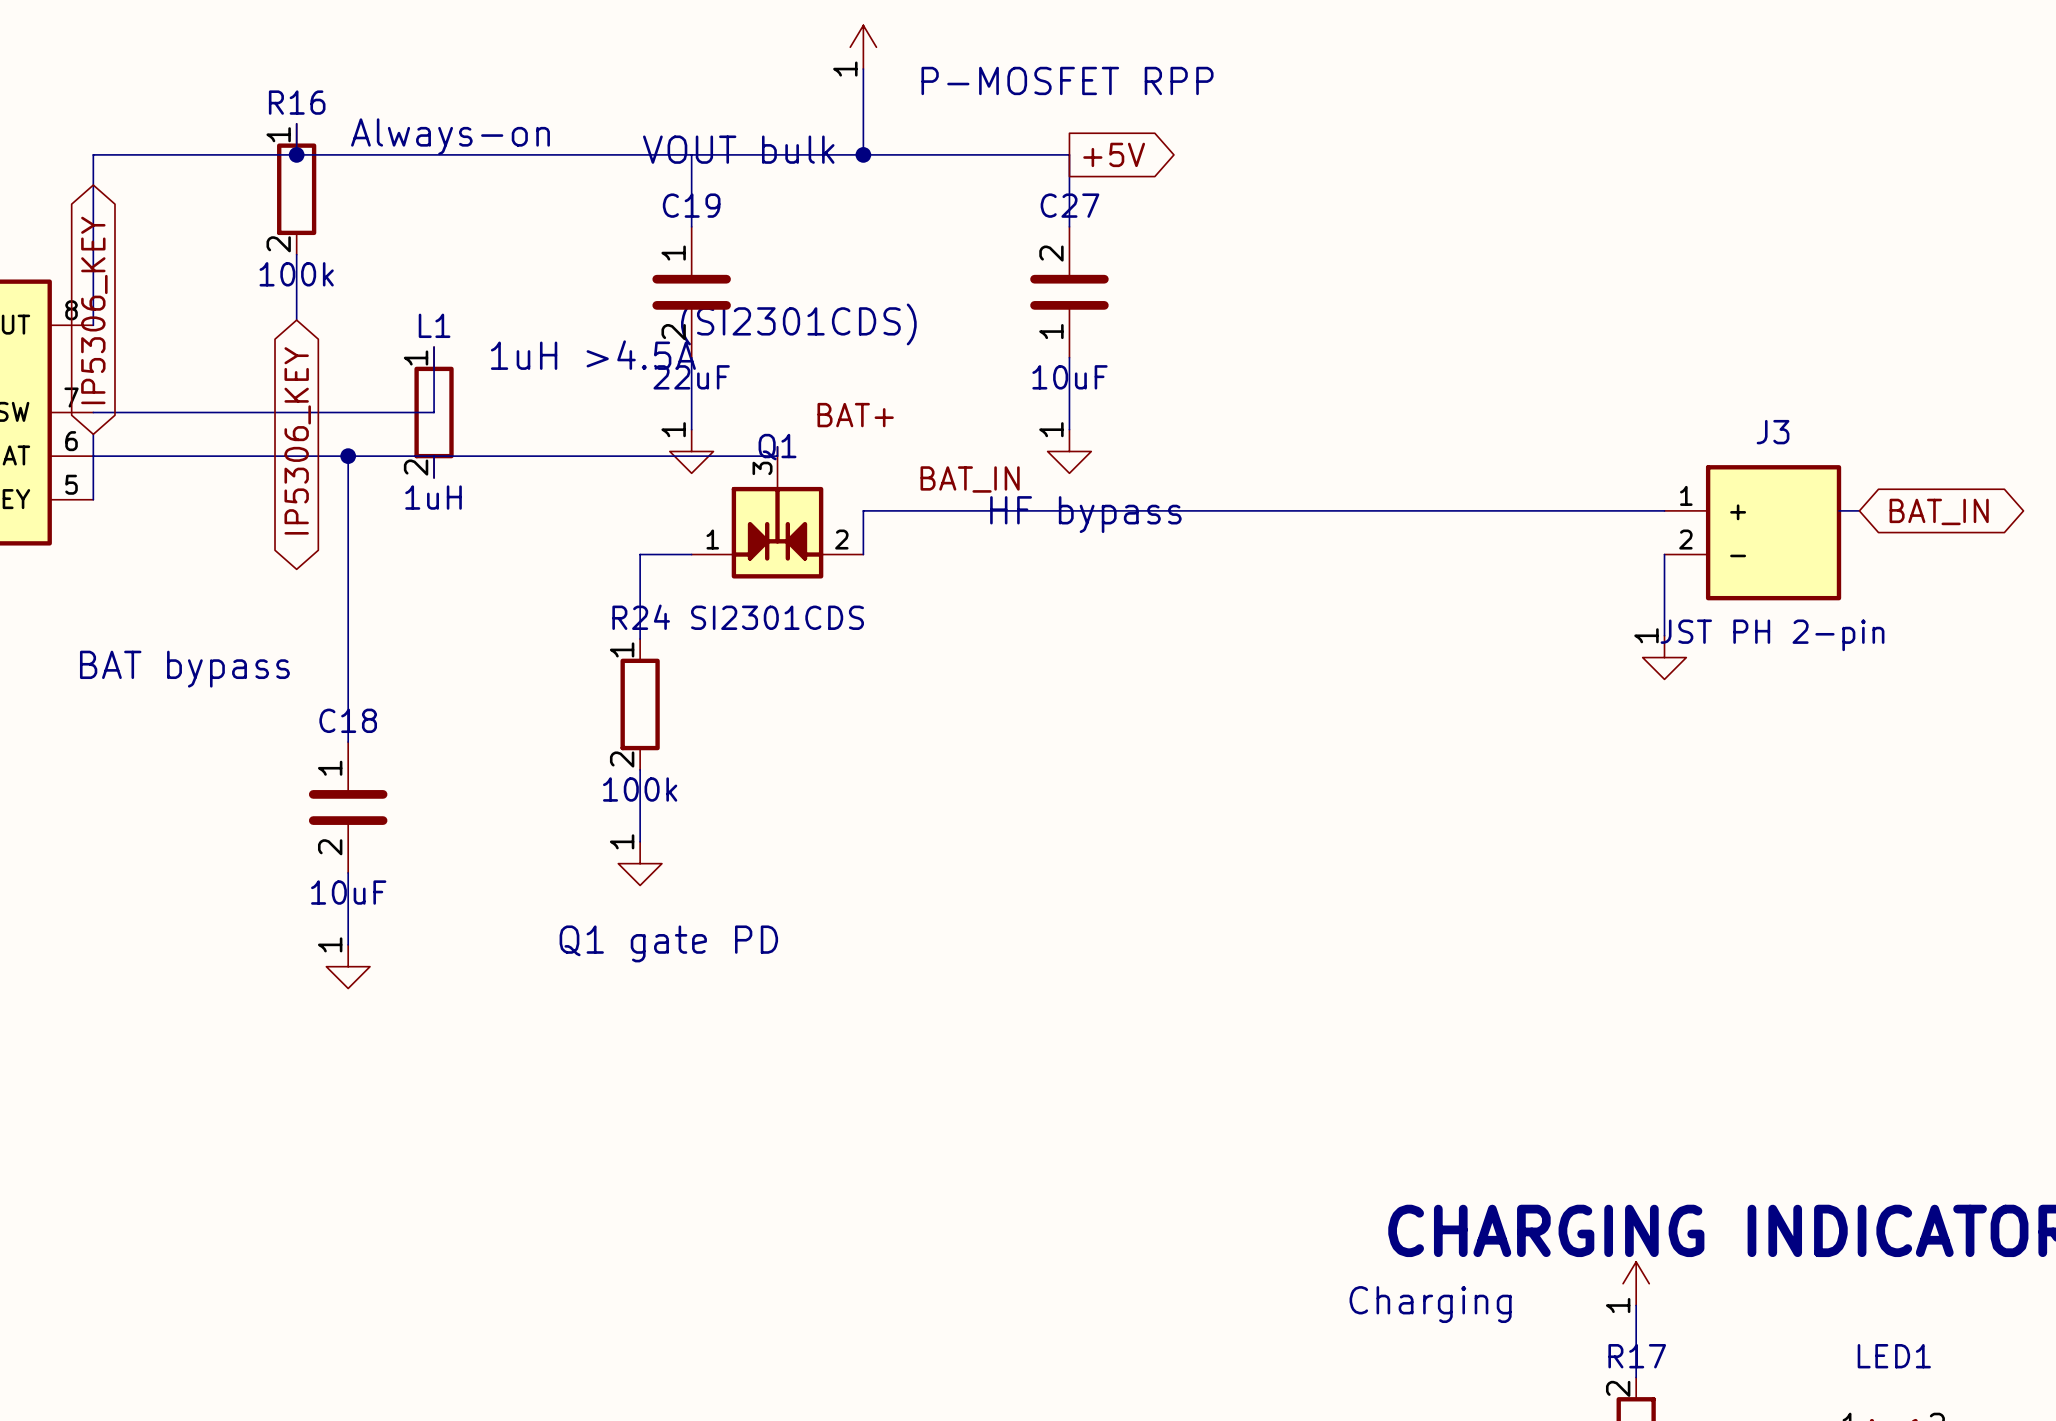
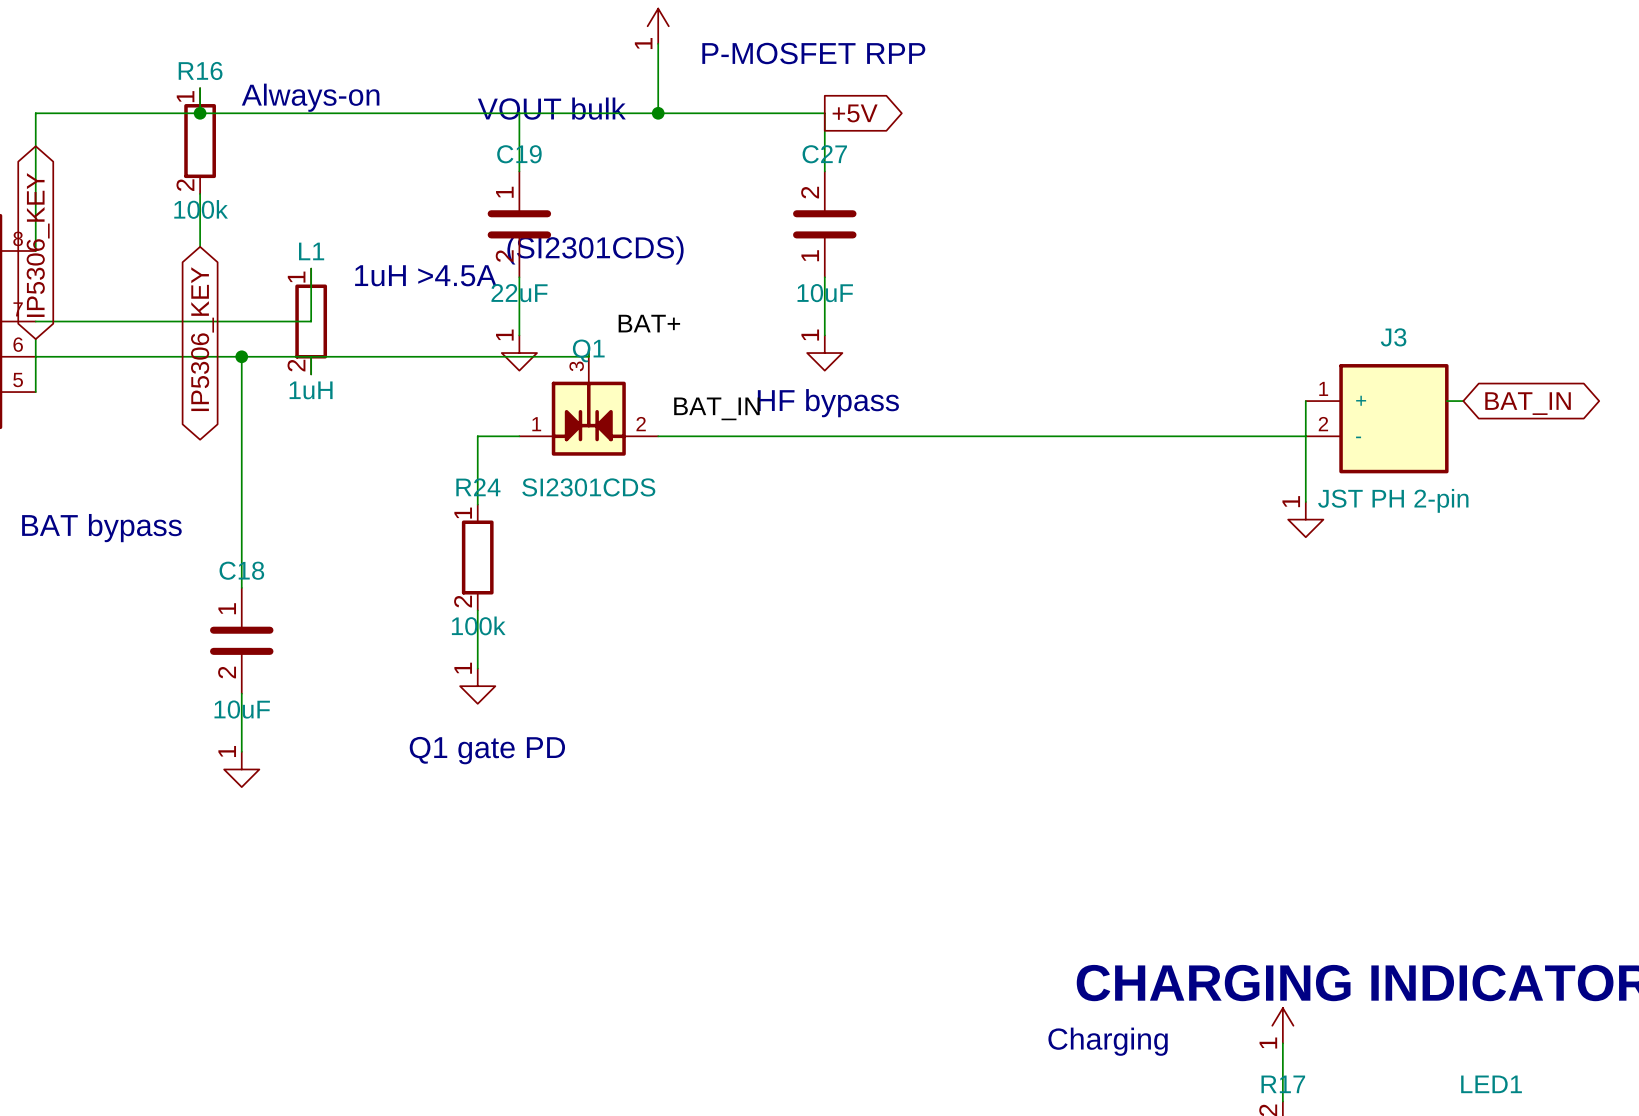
label position: BAT_IN (970, 479) -> BAT_IN (716, 408)
wire: (1664, 510) (863, 510) (863, 554) -> (1305, 401) (1305, 436) (658, 436)

